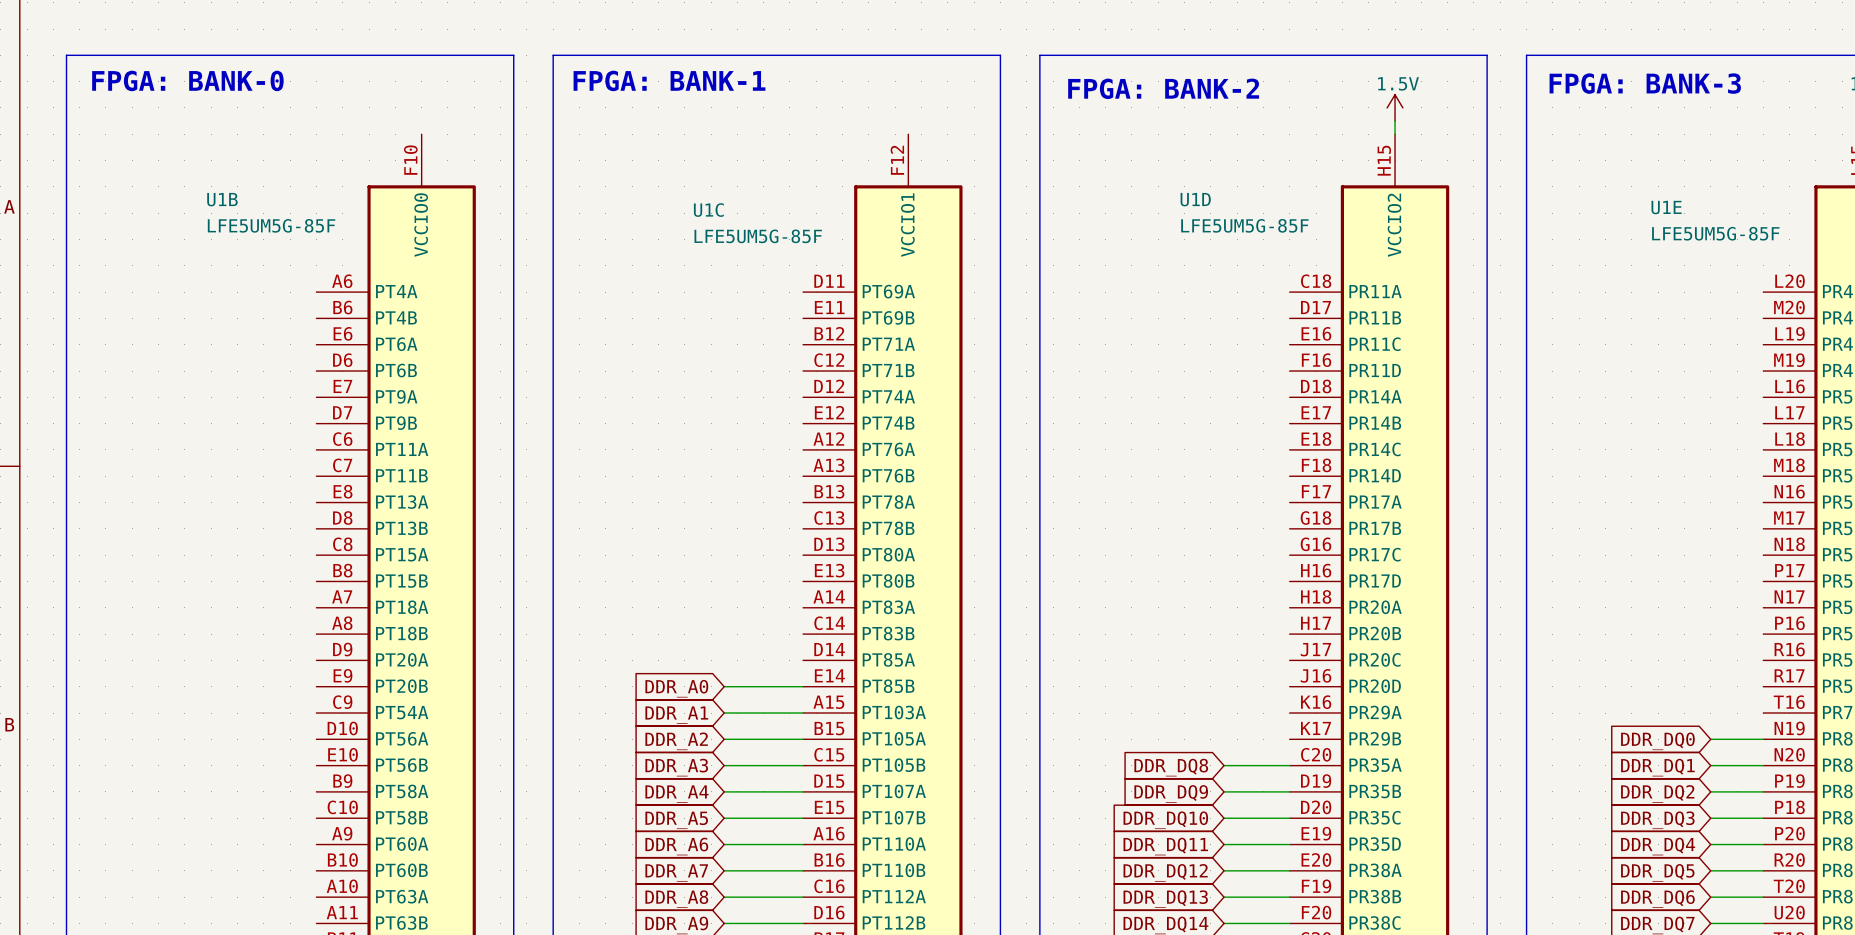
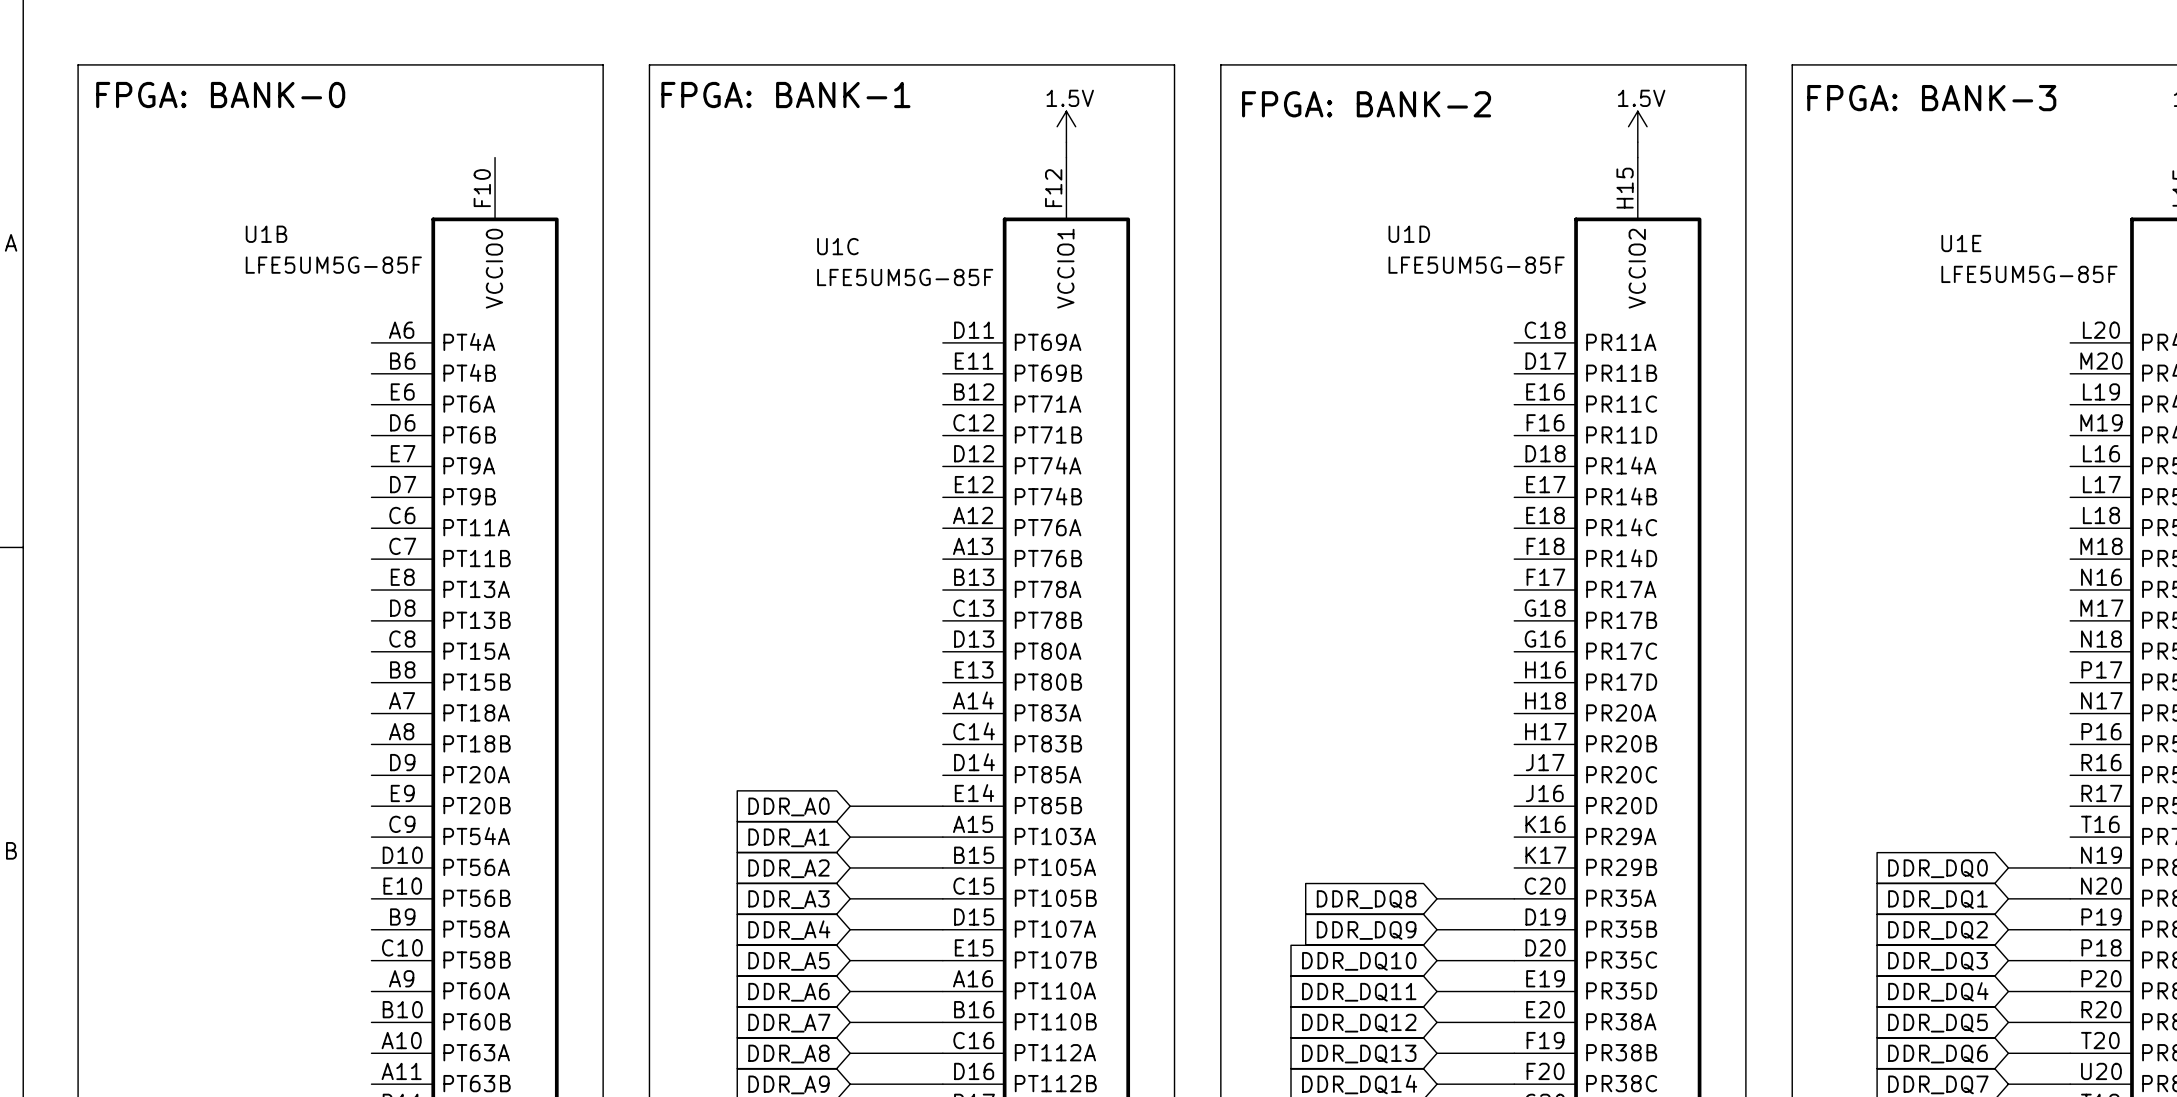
power symbol: none -> 1.5V (1066, 126)
wire: none -> (1066, 142) (1066, 157)

